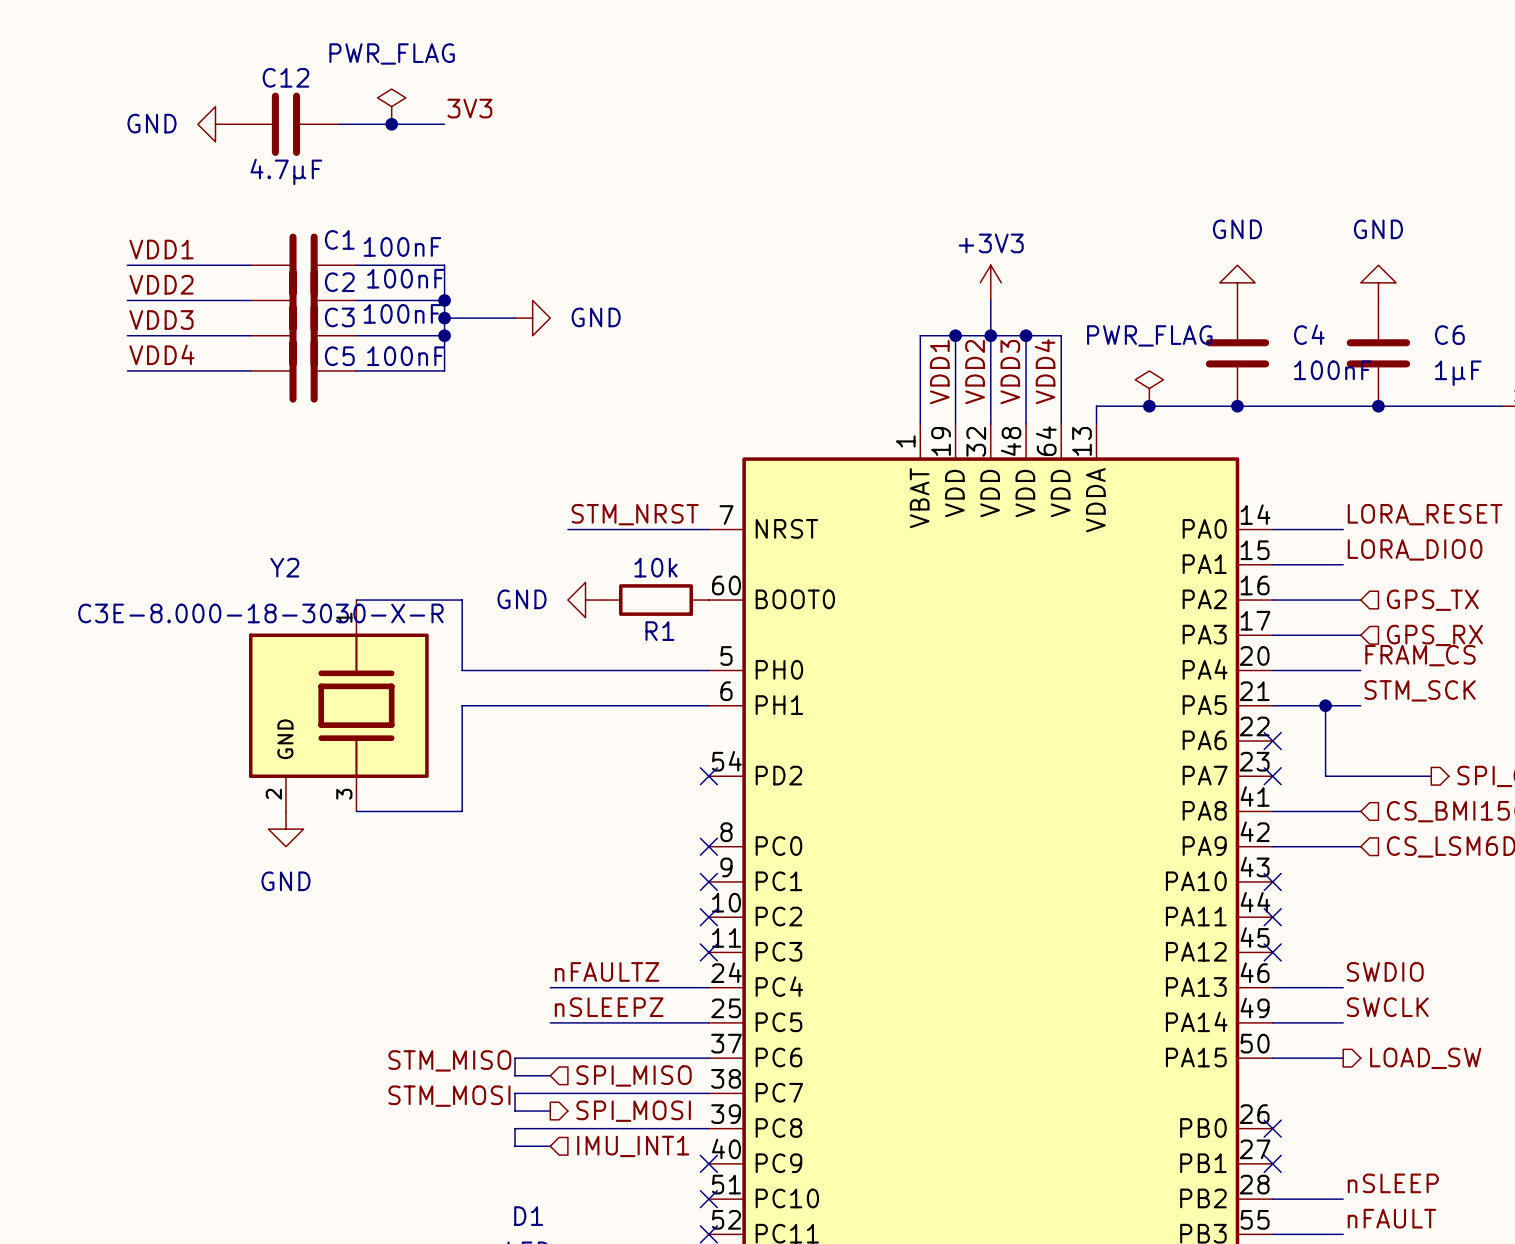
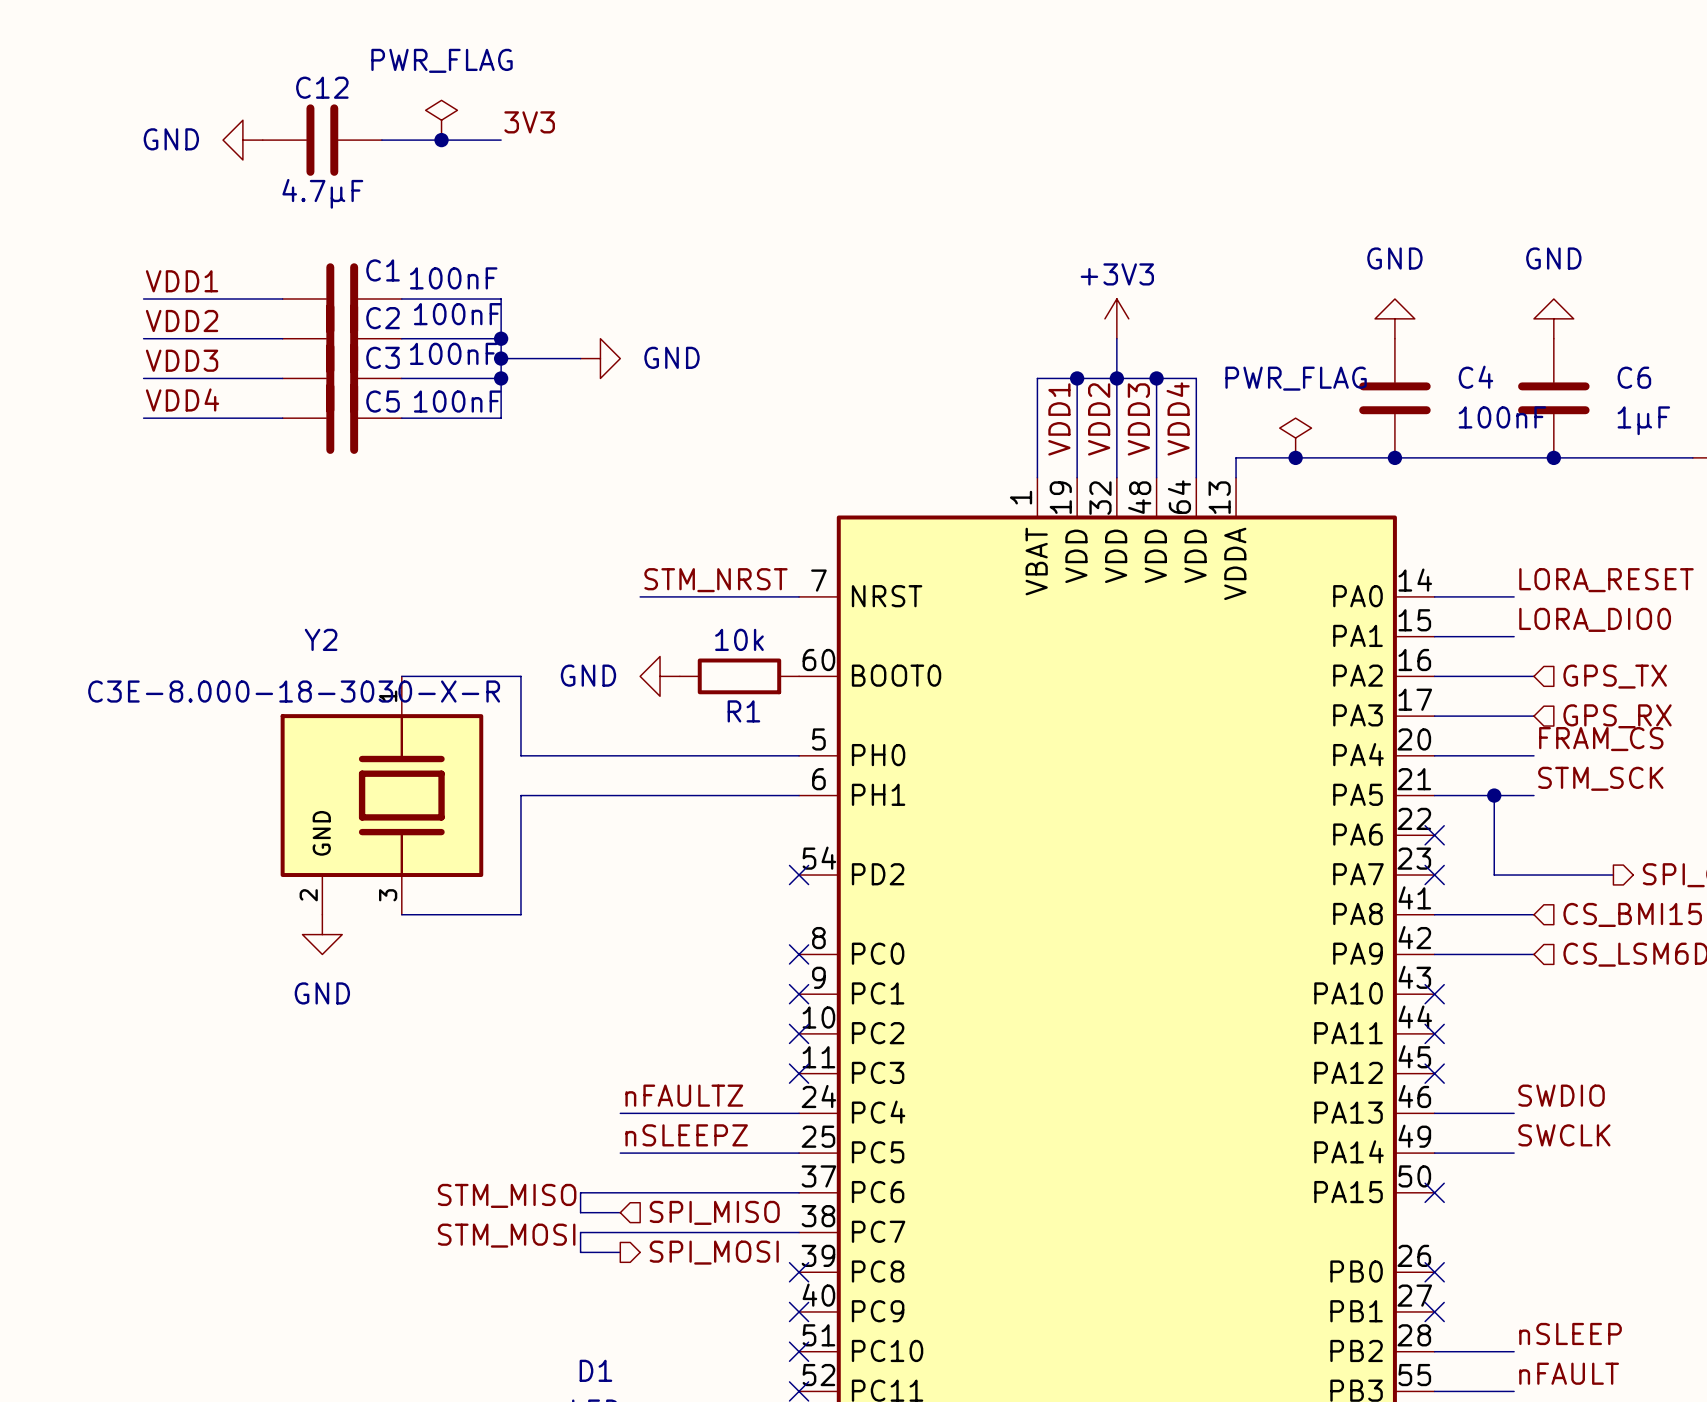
wire: (1272, 1058) (1343, 1058) -> none
no-connect mark: none -> (1434, 1192)
hierarchical label: LOAD_SW (1425, 1058) -> none
wire: (708, 1128) (515, 1128) (515, 1146) (550, 1146) -> none
no-connect mark: none -> (799, 1272)
hierarchical label: IMU_INT1 (633, 1146) -> none

